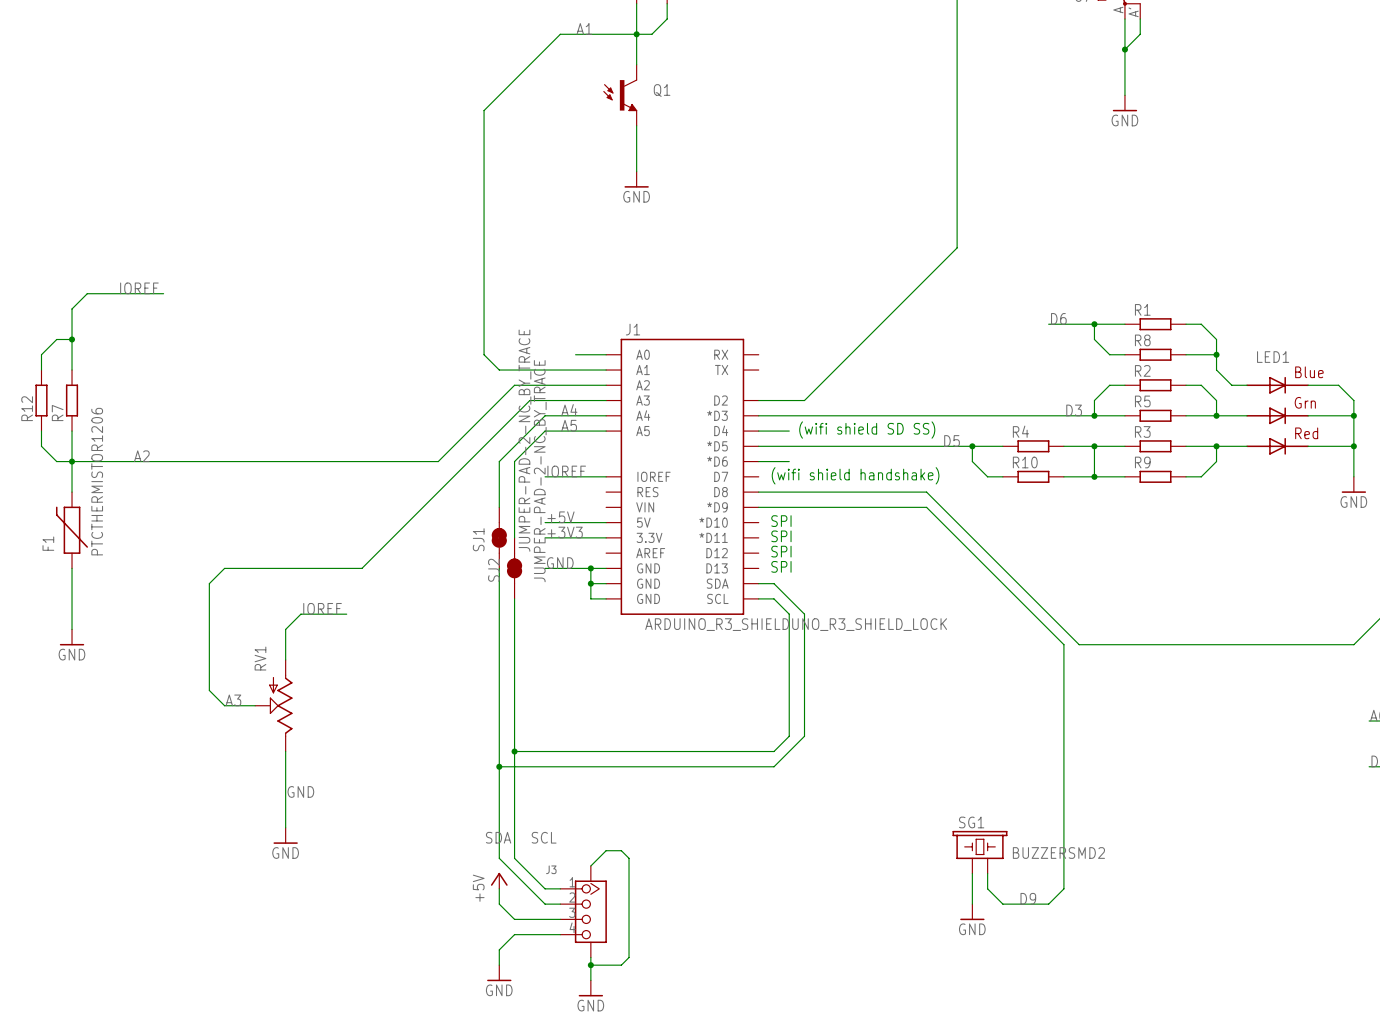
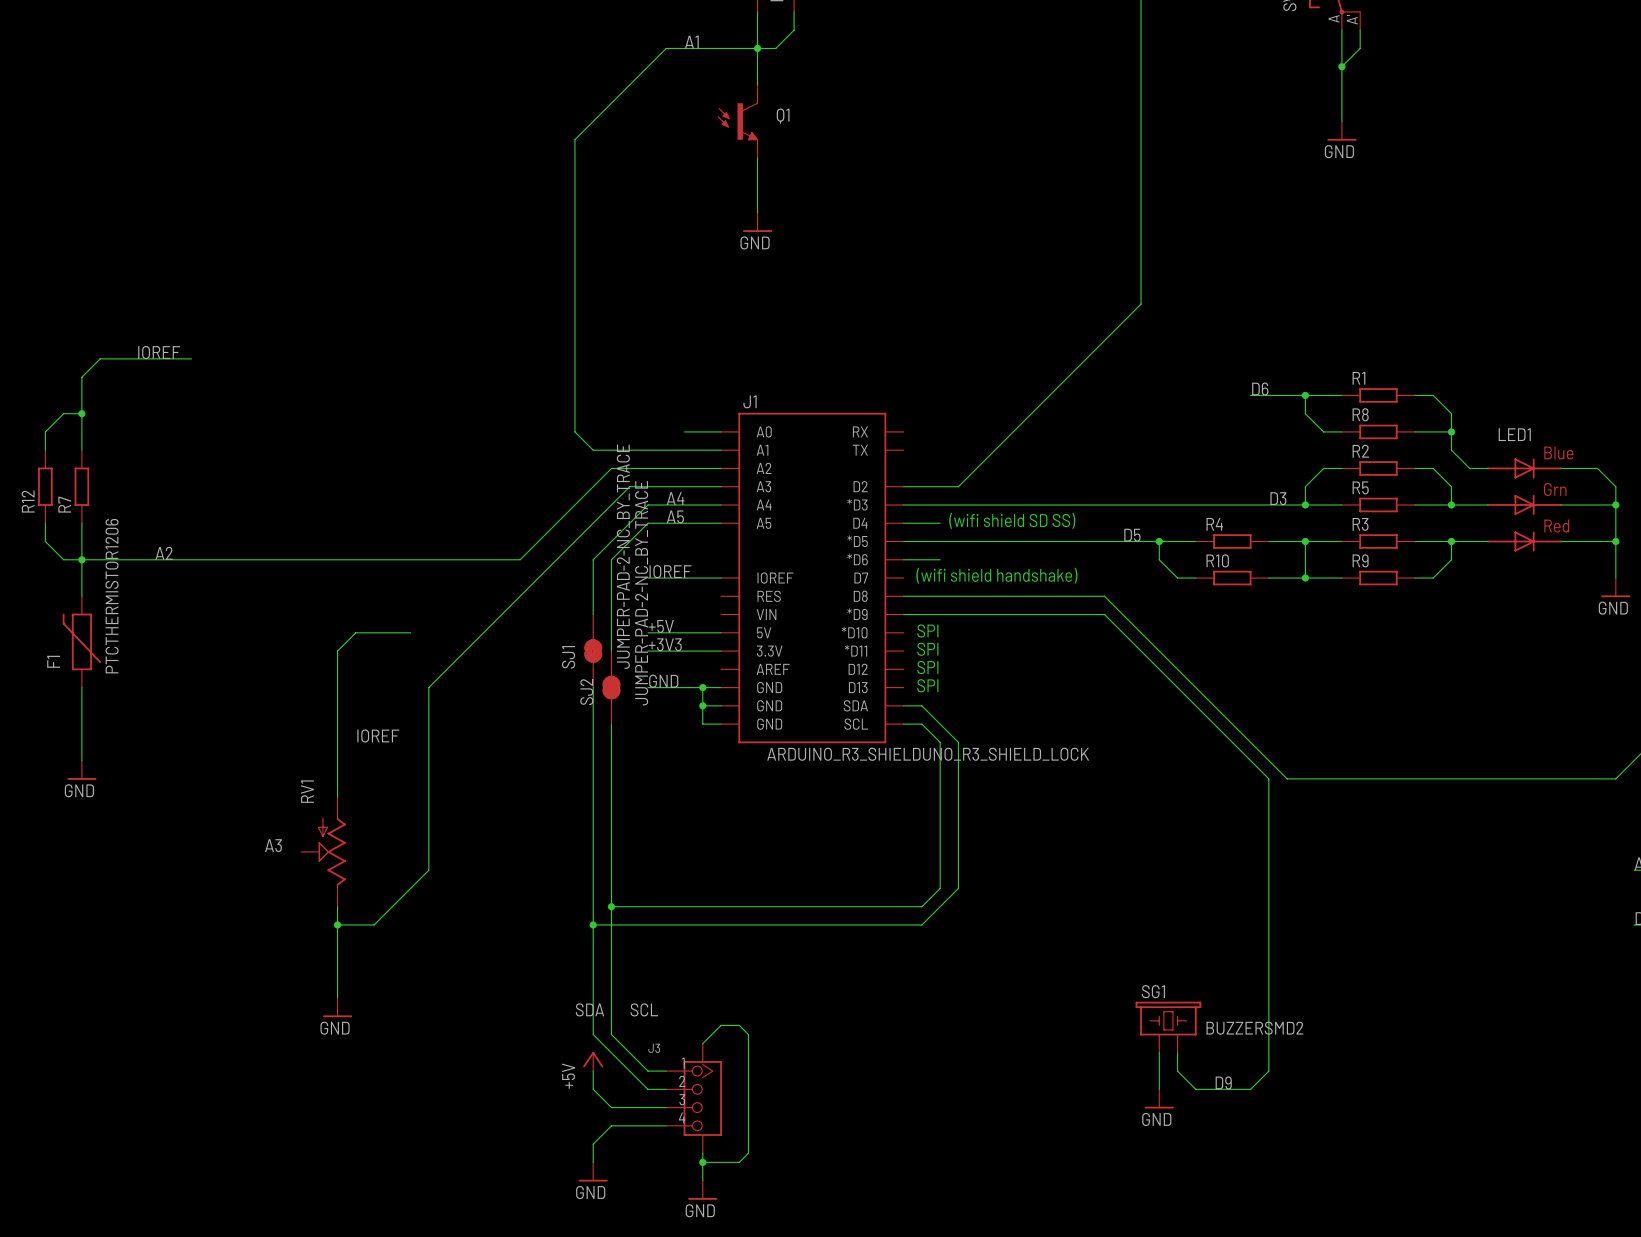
wire: (361, 568) (224, 568) (209, 583) (209, 690) (224, 705) (255, 705) -> (428, 687) (428, 870) (374, 924) (337, 924)
wire: (346, 614) (300, 614) (285, 629) -> (410, 632) (355, 632) (337, 651) (337, 760)
junction: none -> (337, 924)
label: GND (300, 791) -> none

